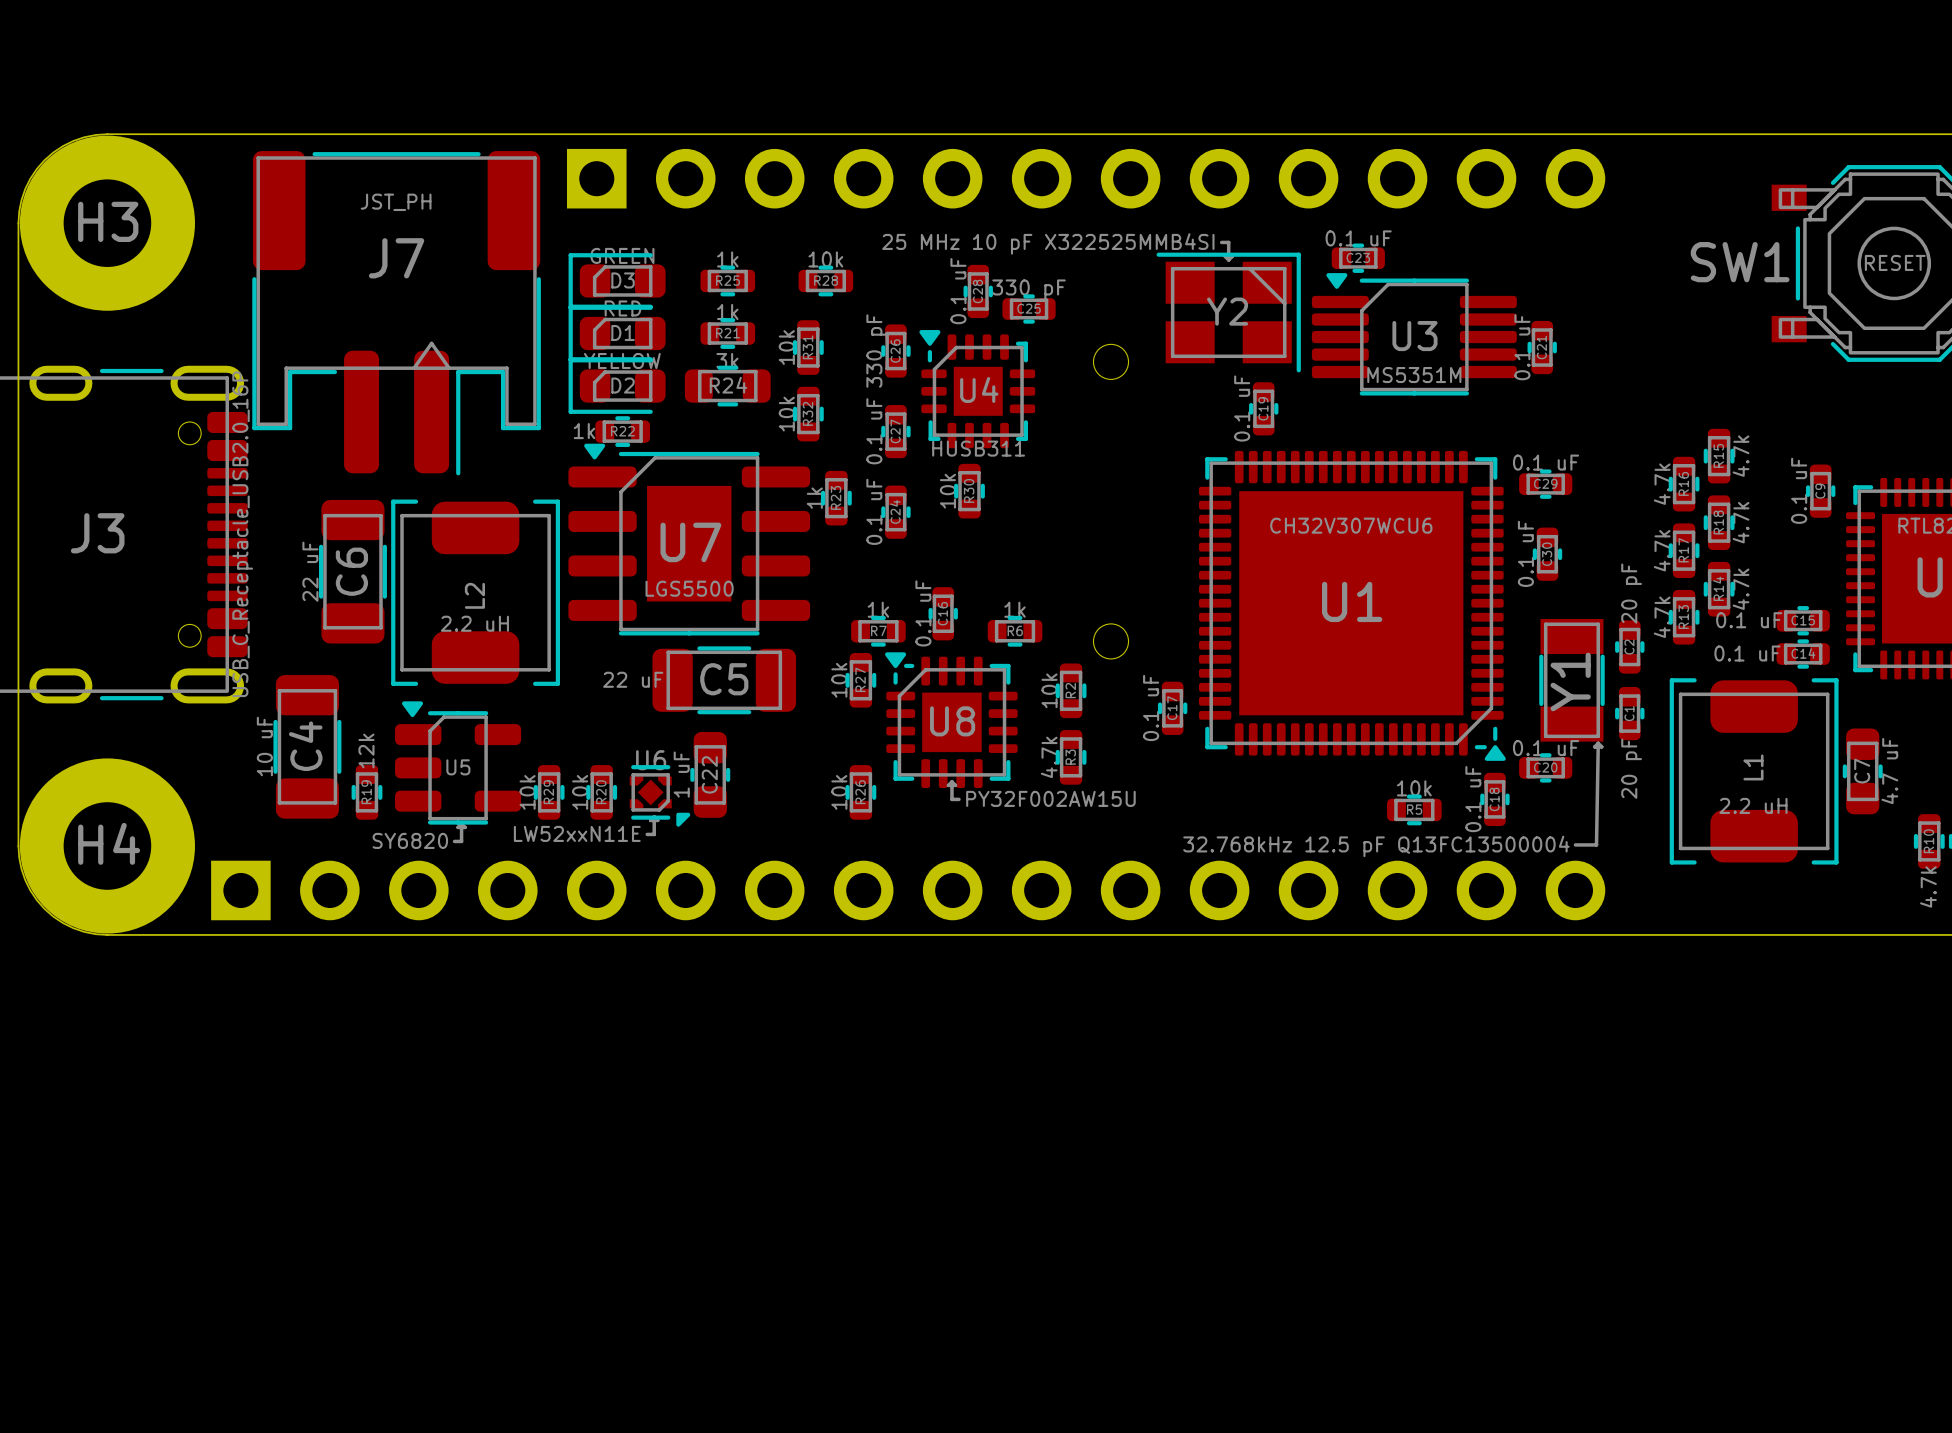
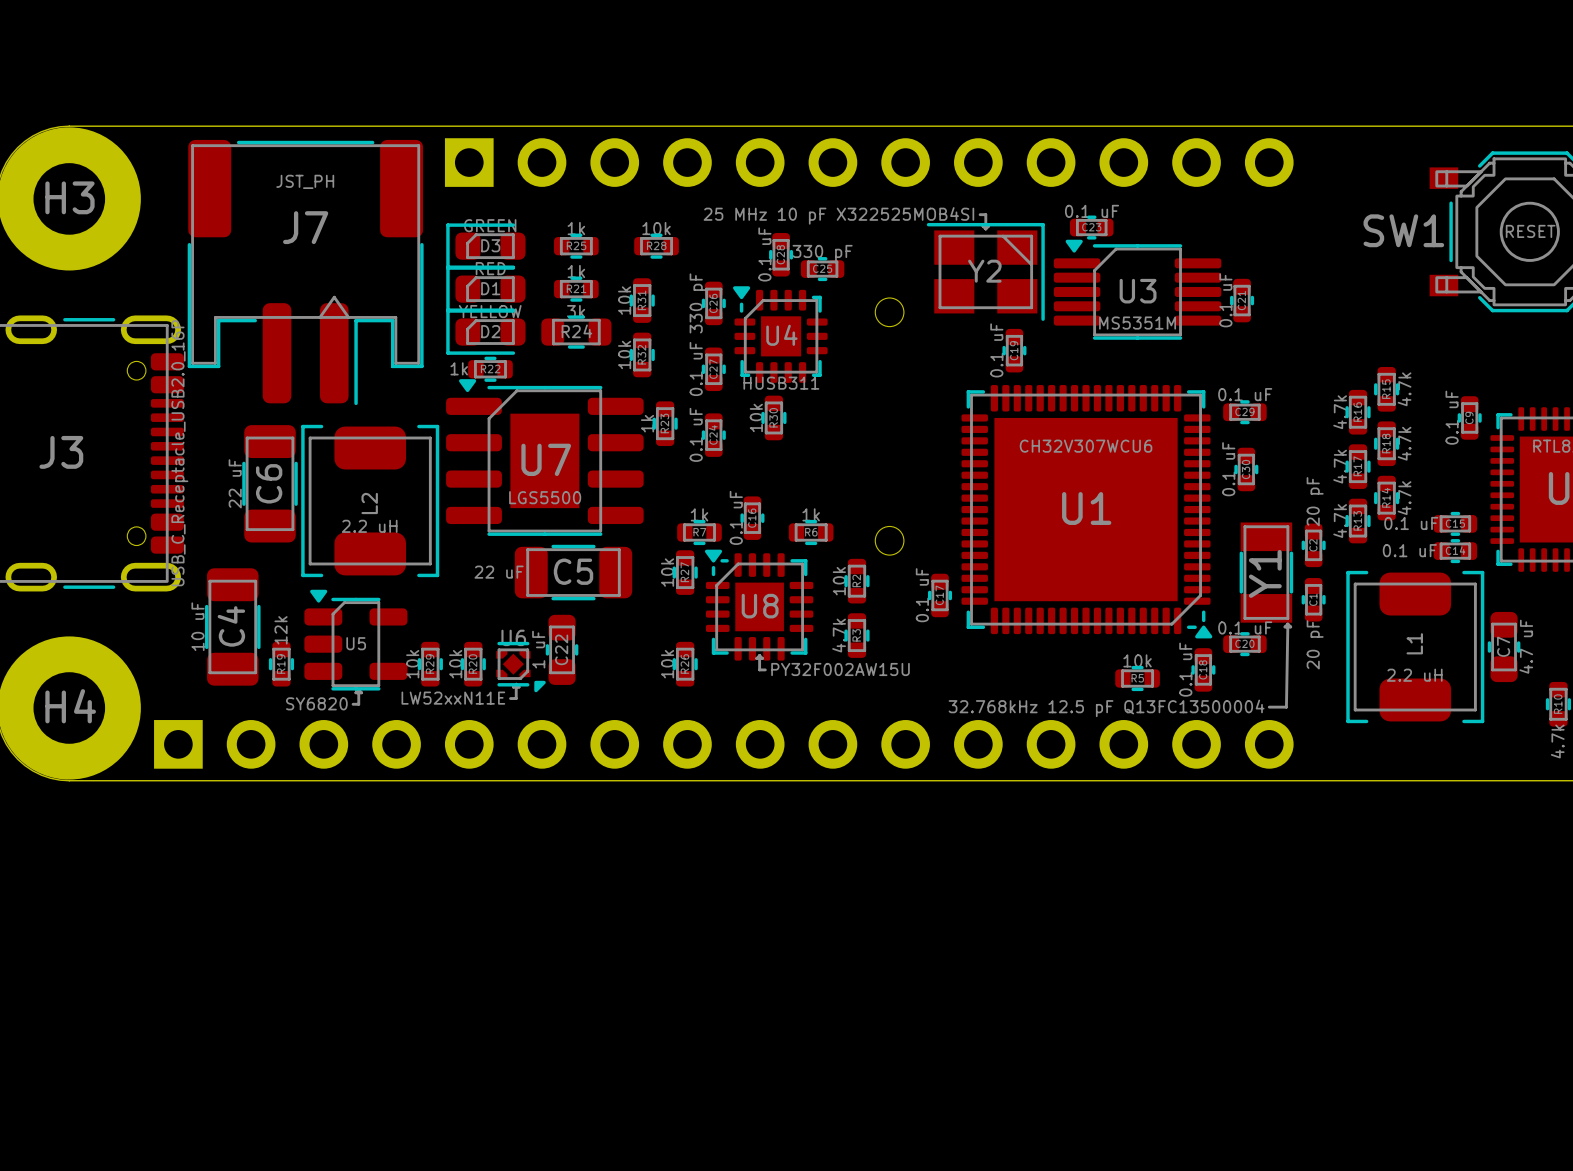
Y2 value: 25 MHz 10 pF X322525MMB4SI (1048, 243) -> 25 MHz 10 pF X322525MOB4SI (838, 215)

